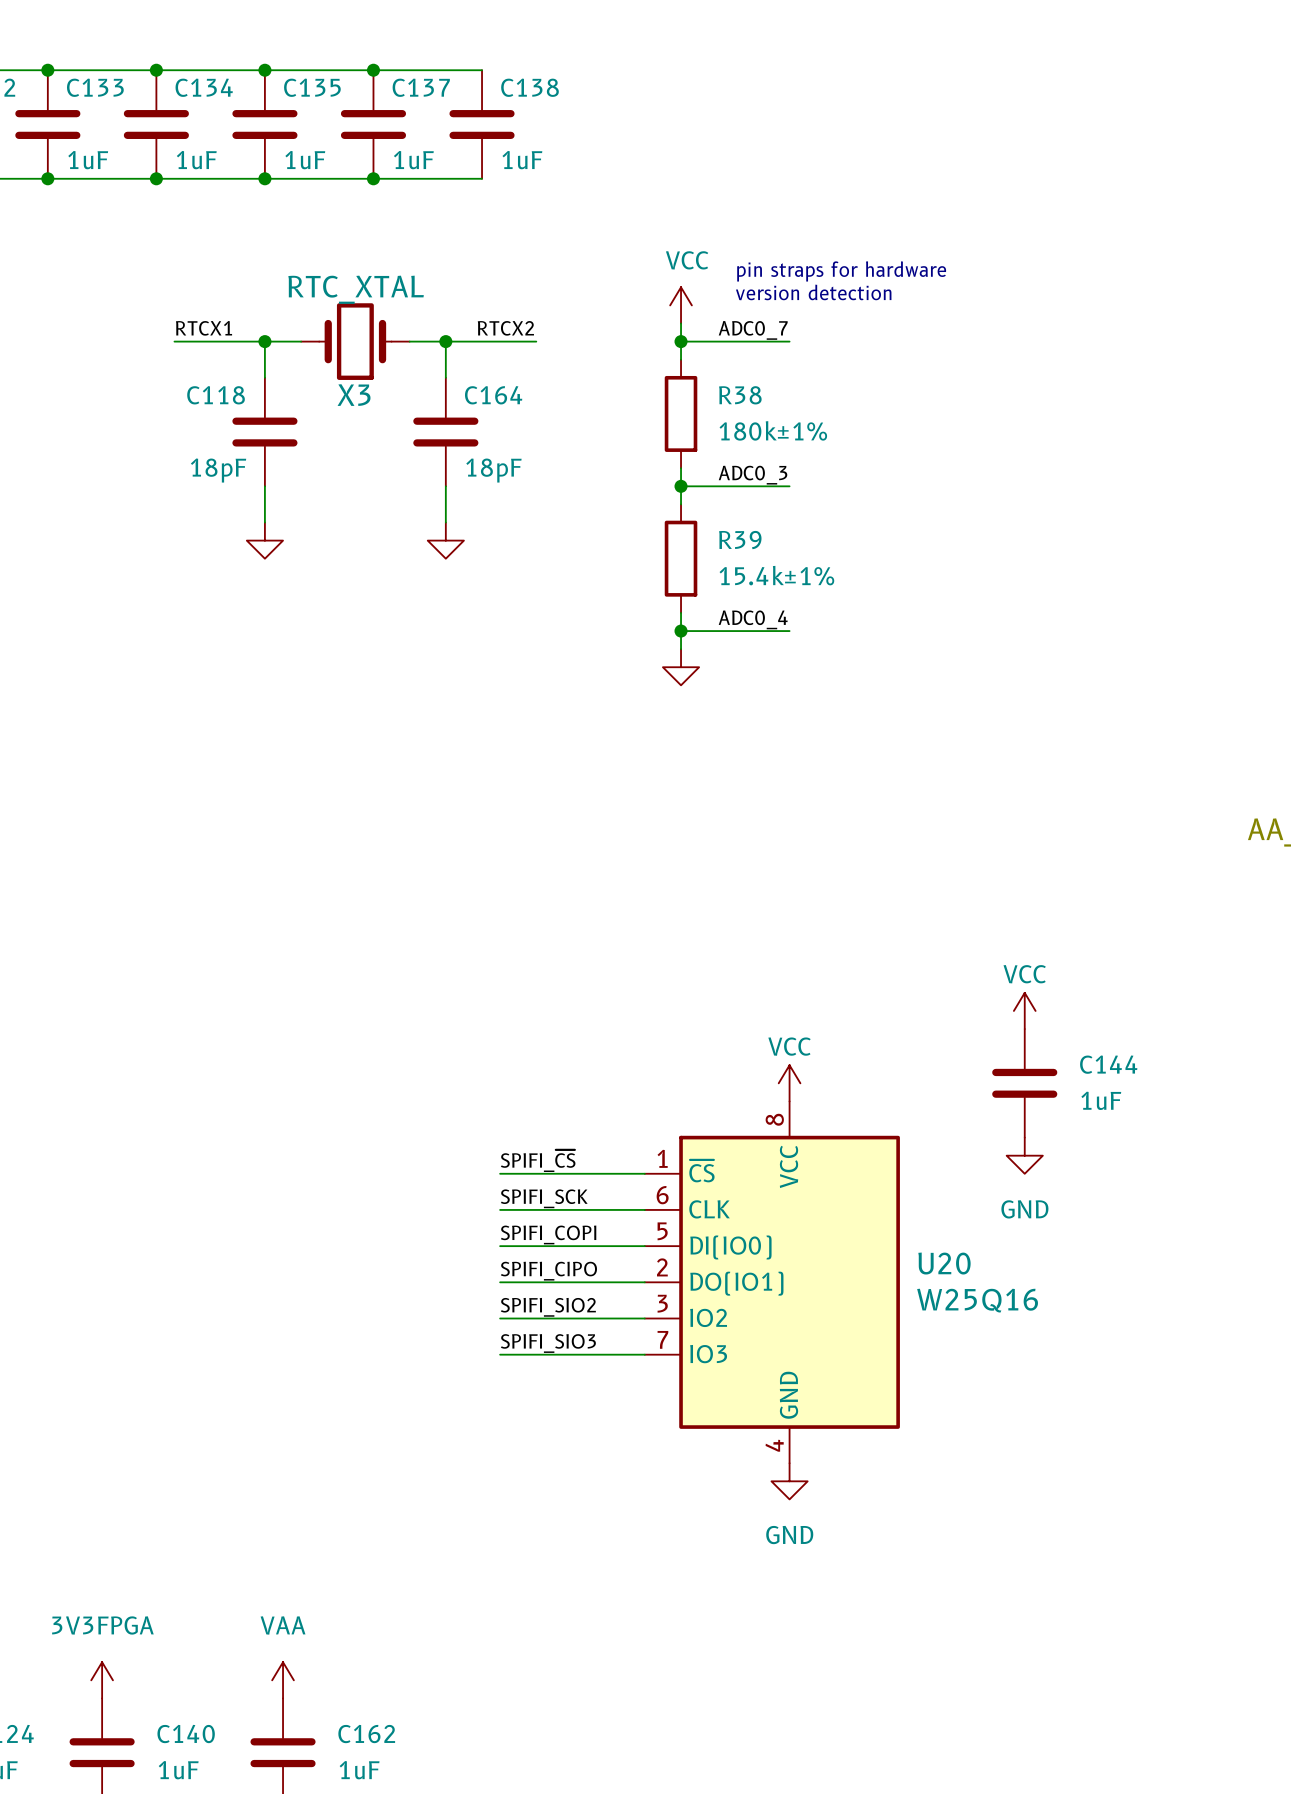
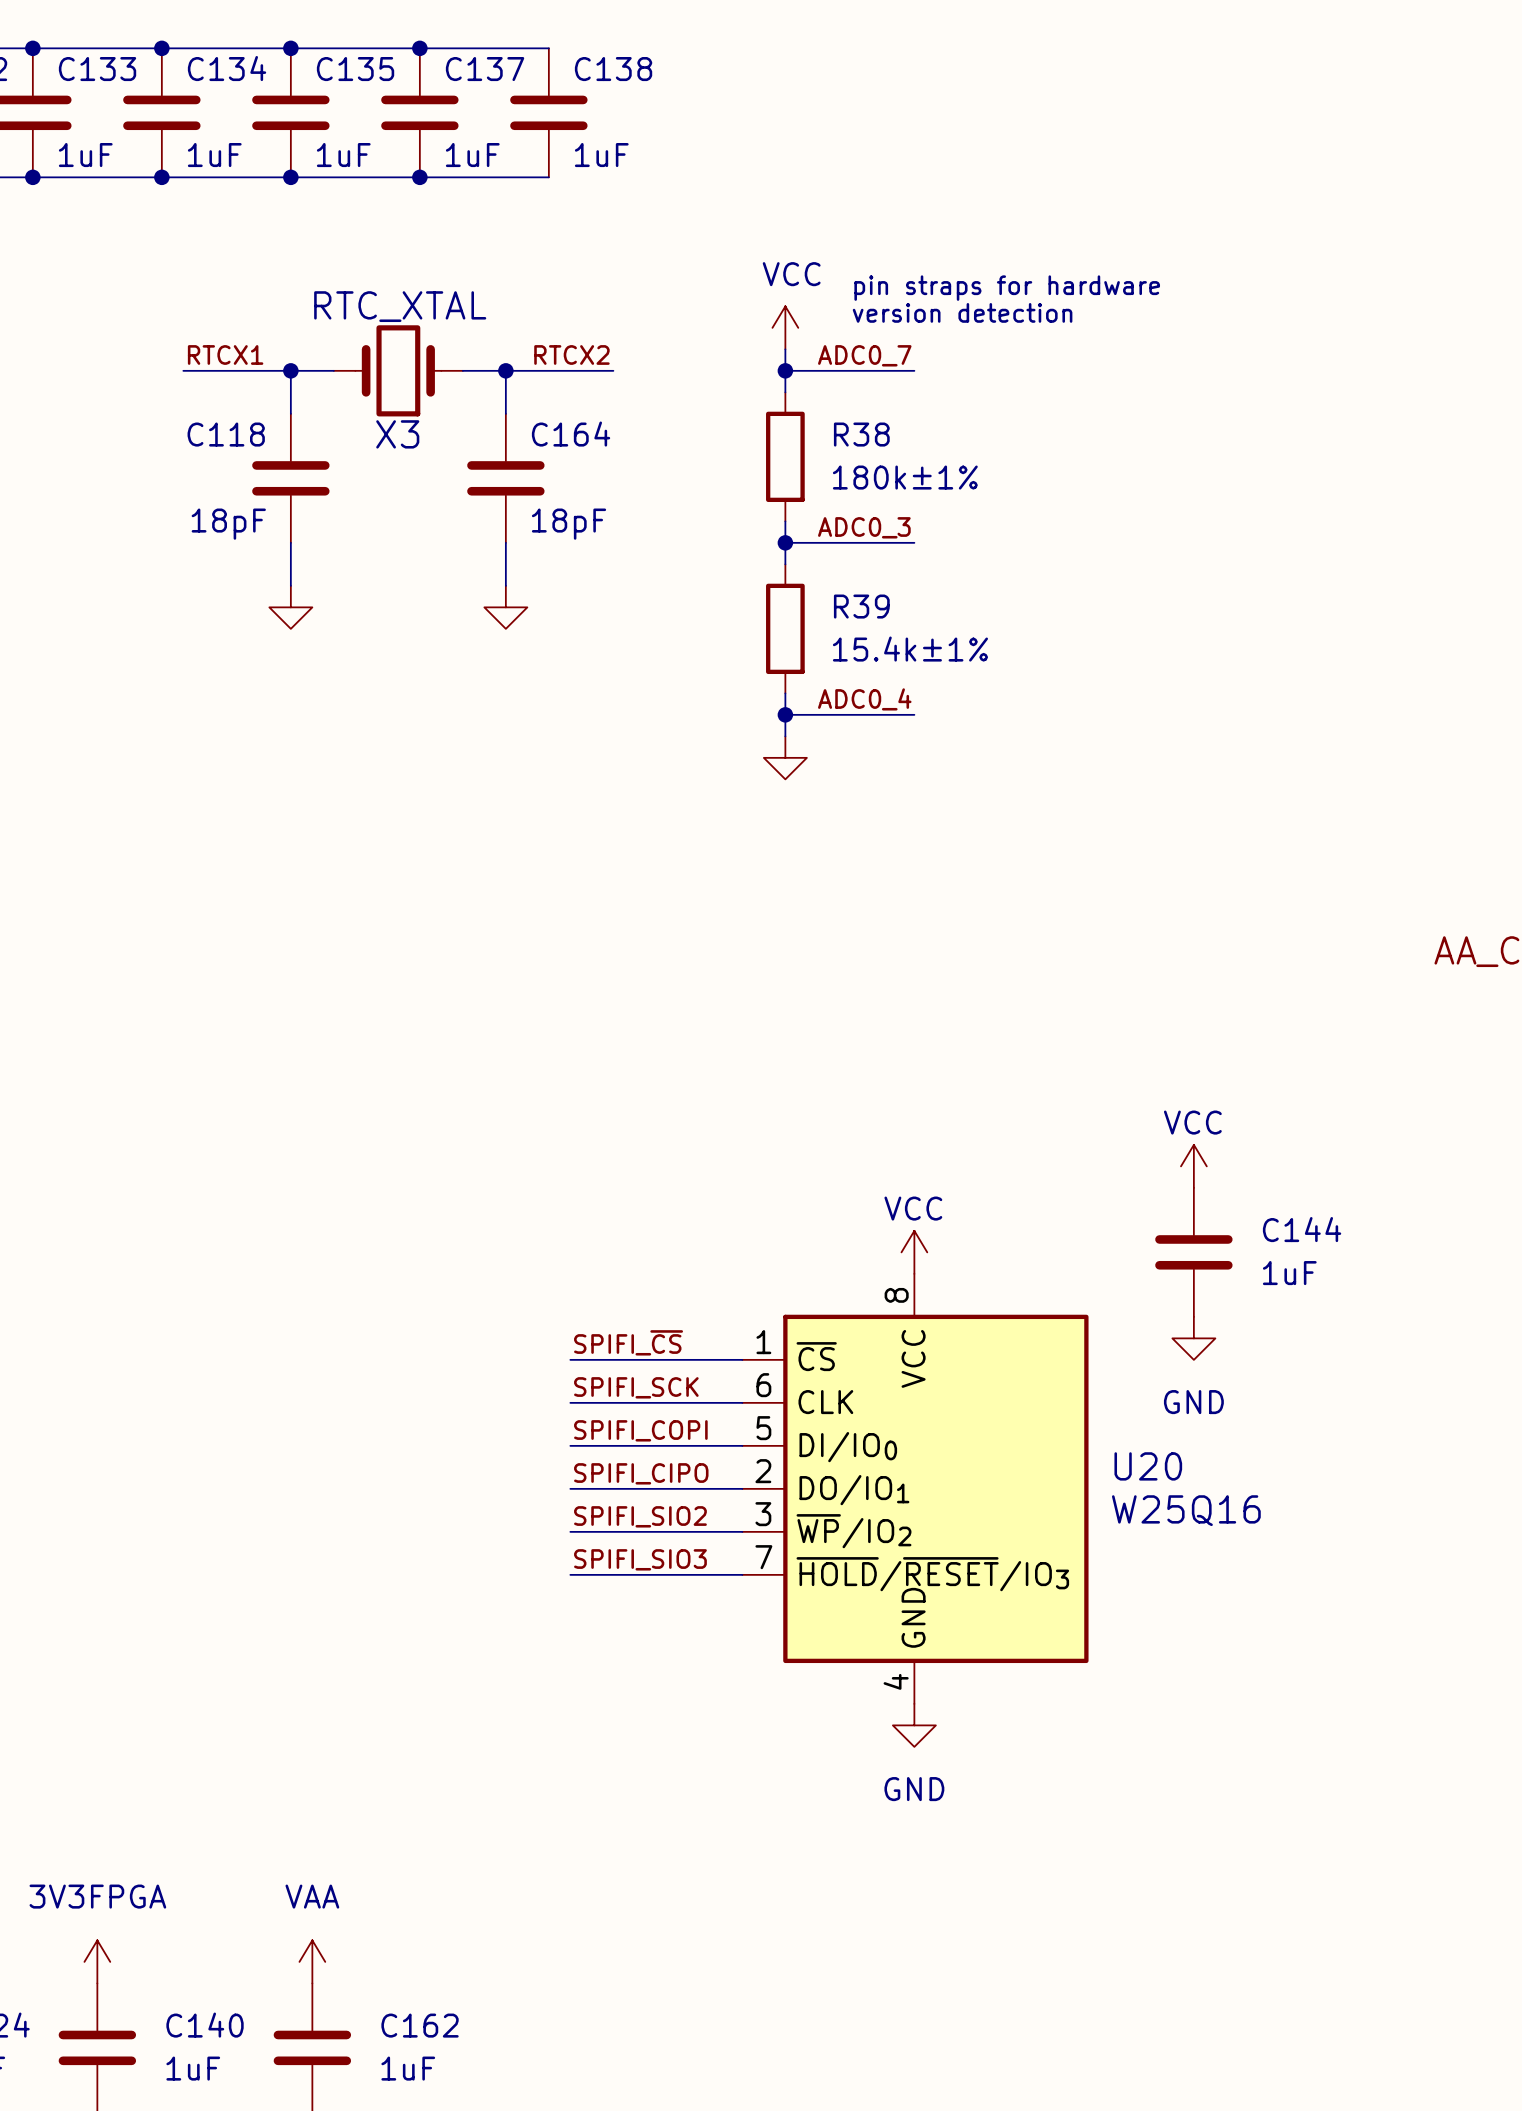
U20 symbol: [644, 1101, 900, 1464] -> [742, 1273, 1089, 1704]

